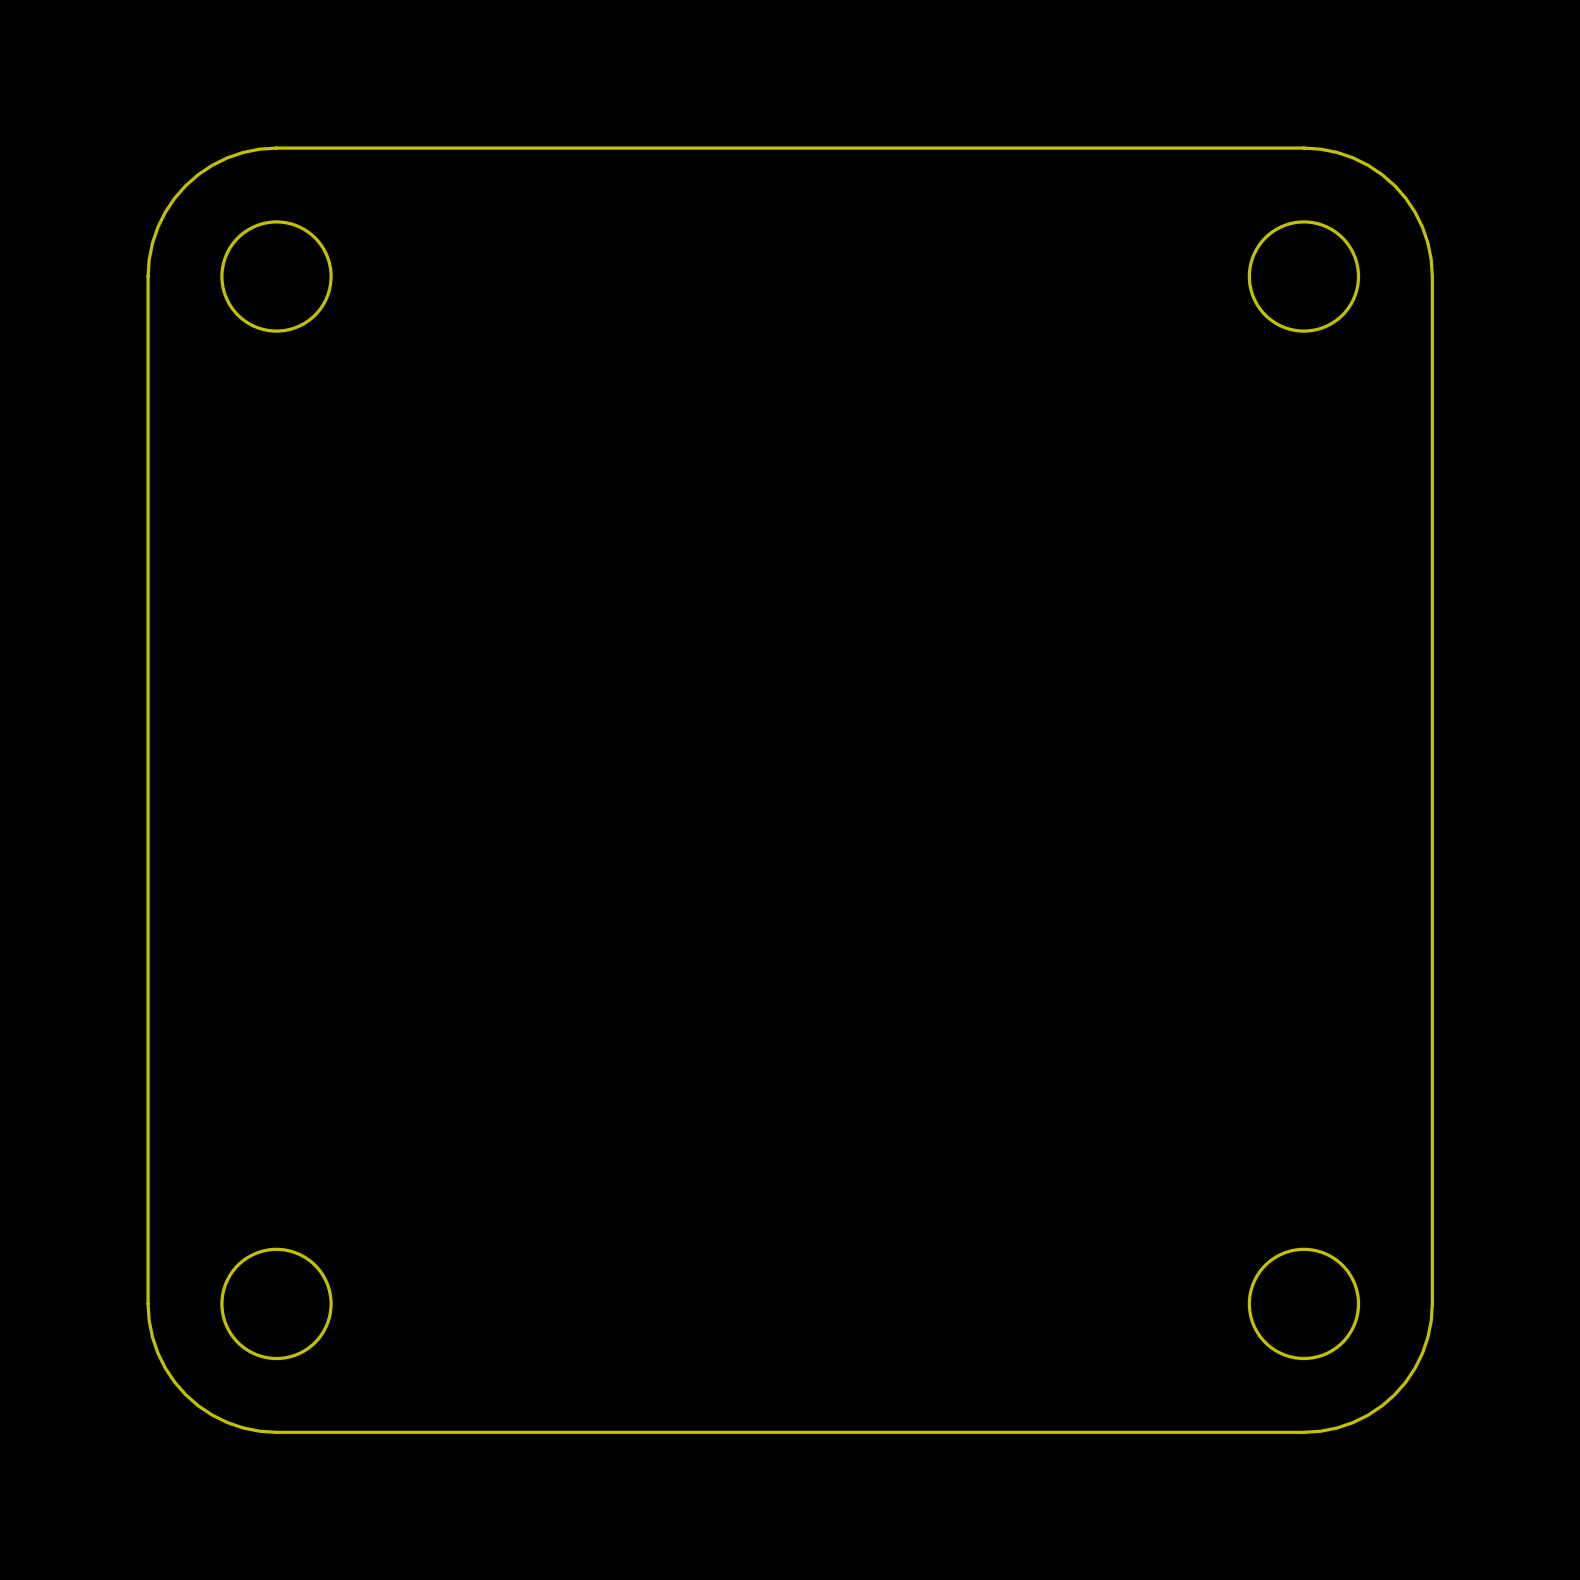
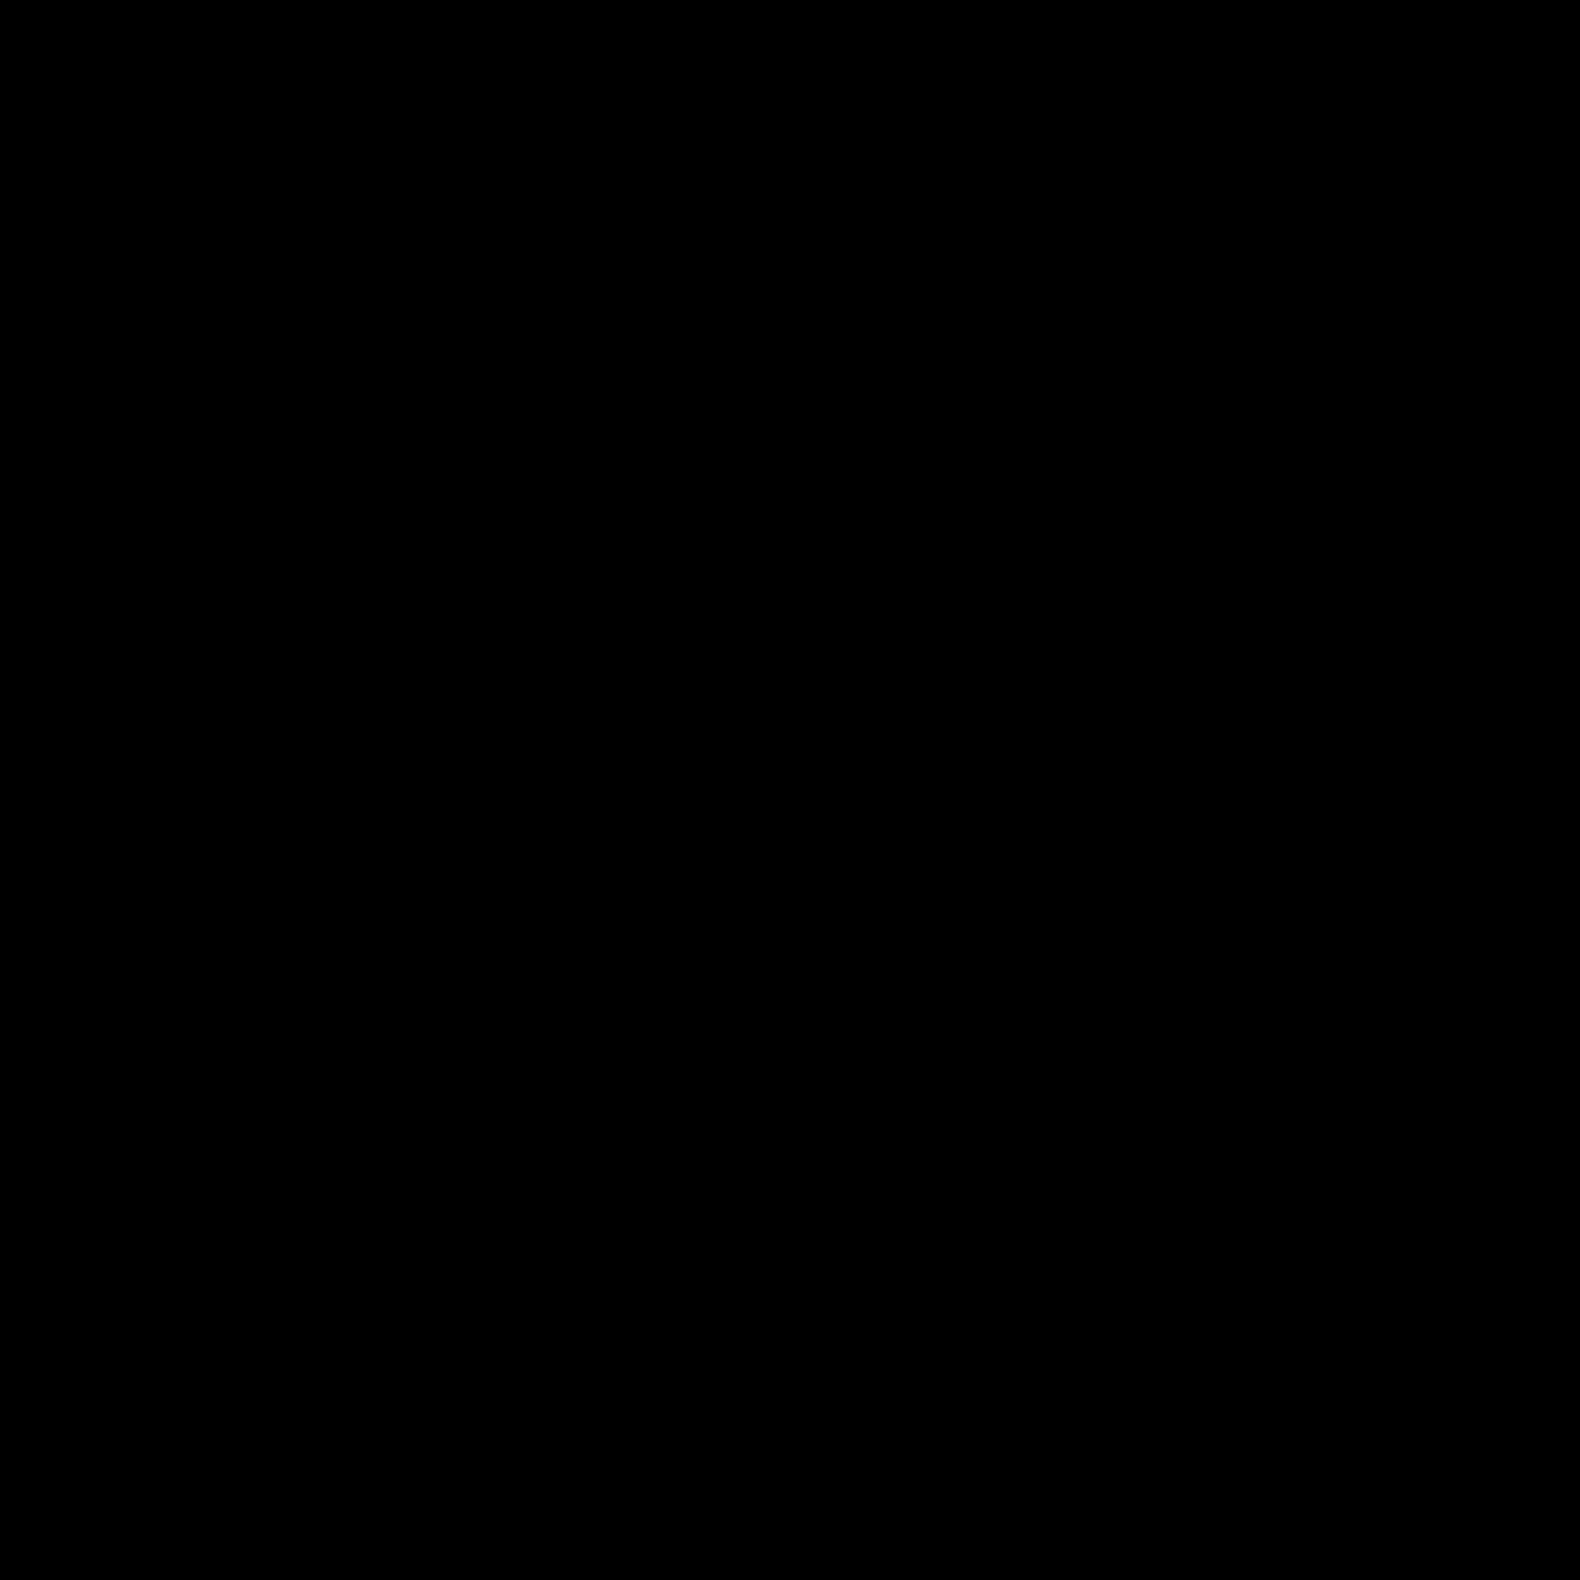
board edge: (1303, 148) (276, 148) (243, 152) (227, 157) (198, 174) (185, 185) (174, 198) (157, 227) (152, 243) (148, 276) (148, 1303) (149, 1320) (157, 1353) (174, 1382) (185, 1394) (198, 1405) (227, 1422) (243, 1427) (276, 1432) (1303, 1432) (1320, 1431) (1353, 1422) (1382, 1405) (1394, 1394) (1415, 1368) (1422, 1353) (1431, 1320) (1432, 1303) (1431, 259) (1422, 227) (1415, 212) (1394, 185) (1382, 174) (1353, 157) (1337, 152) (1303, 148) -> none
round board edge: [220, 220, 333, 333] -> none
round board edge: [1247, 220, 1361, 333] -> none
round board edge: [220, 1247, 333, 1361] -> none
round board edge: [1247, 1247, 1361, 1361] -> none

